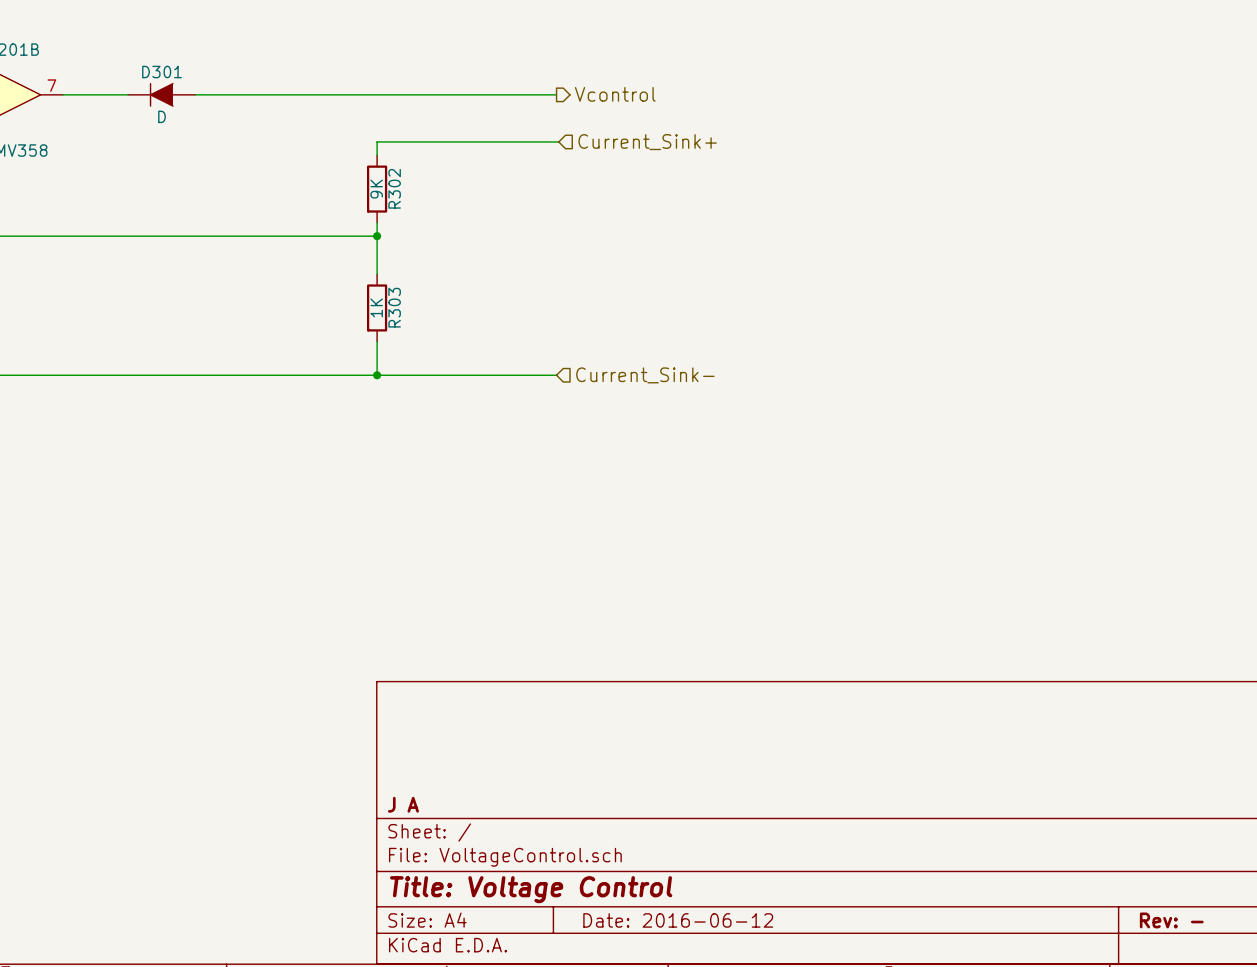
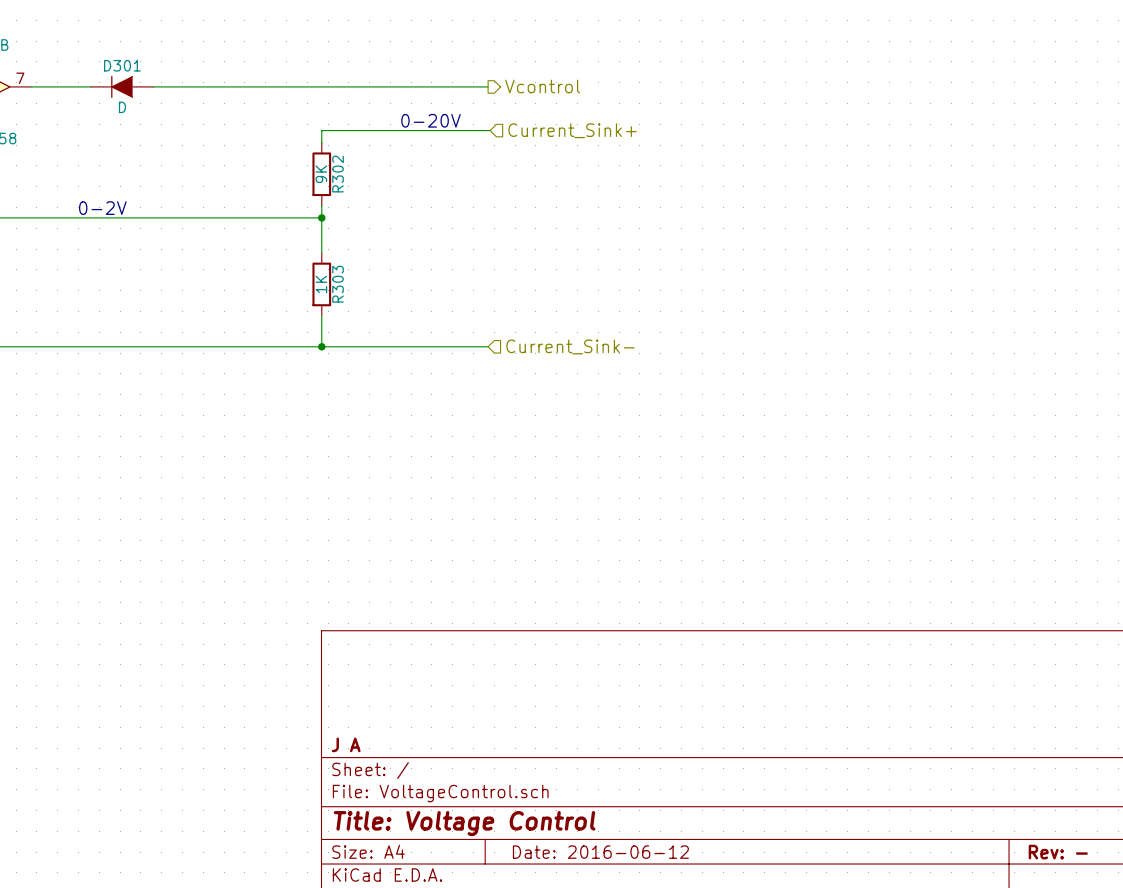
text: none -> 0-20V (431, 120)
text: none -> 0-2V (102, 208)

